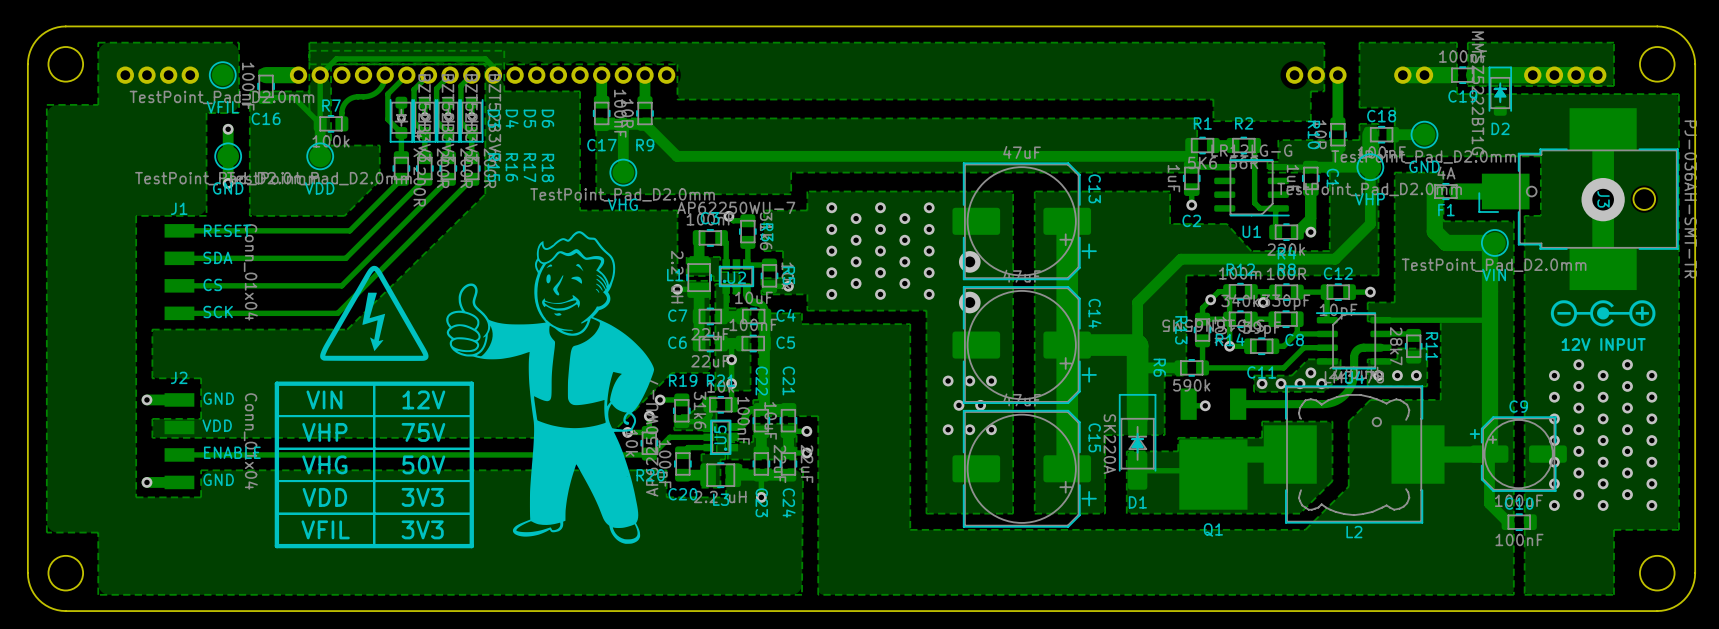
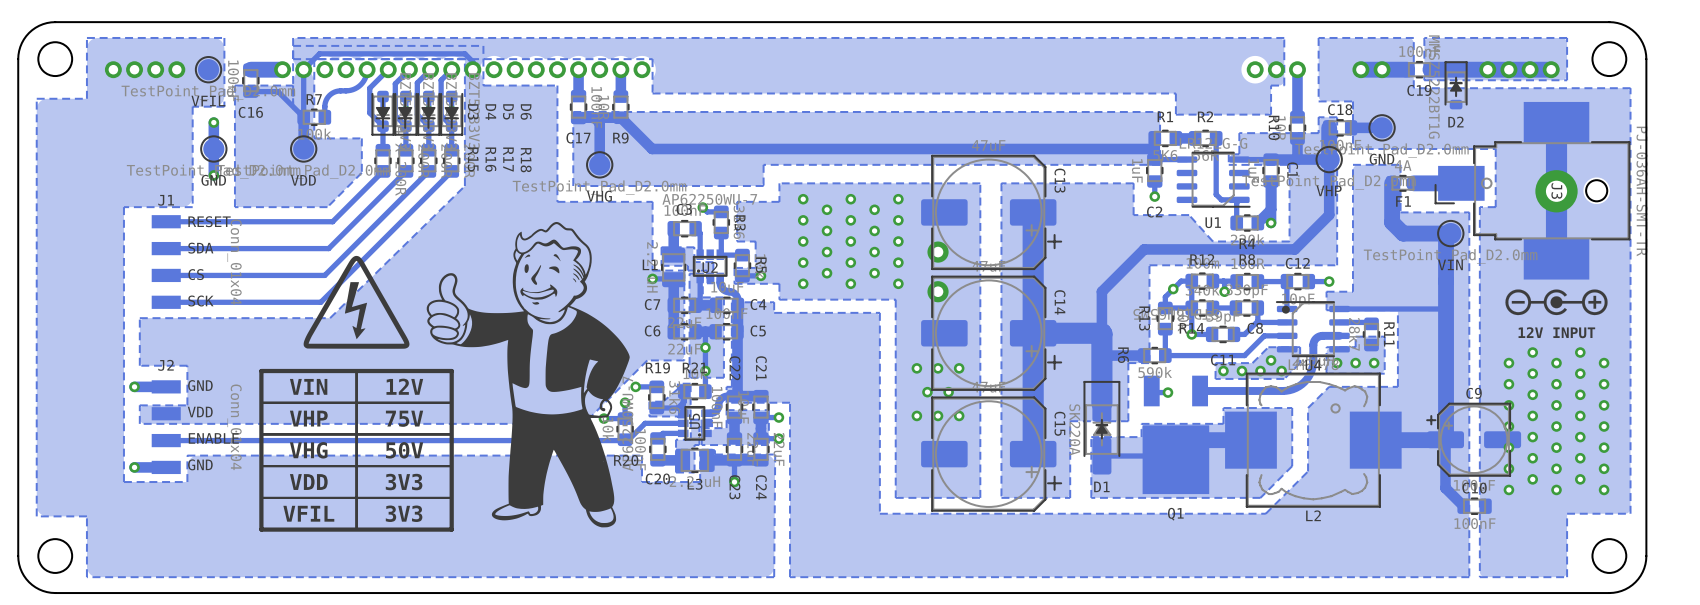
line: none -> (382, 98) (382, 127)
line: none -> (405, 98) (405, 127)
line: none -> (428, 98) (428, 127)
line: none -> (451, 98) (451, 127)
drawing: none -> [375, 106, 459, 120]
line: none -> (389, 118) (376, 118)
line: none -> (411, 118) (398, 118)
line: none -> (434, 118) (422, 118)
line: none -> (458, 118) (445, 118)
drawing: none -> [1281, 305, 1290, 314]

